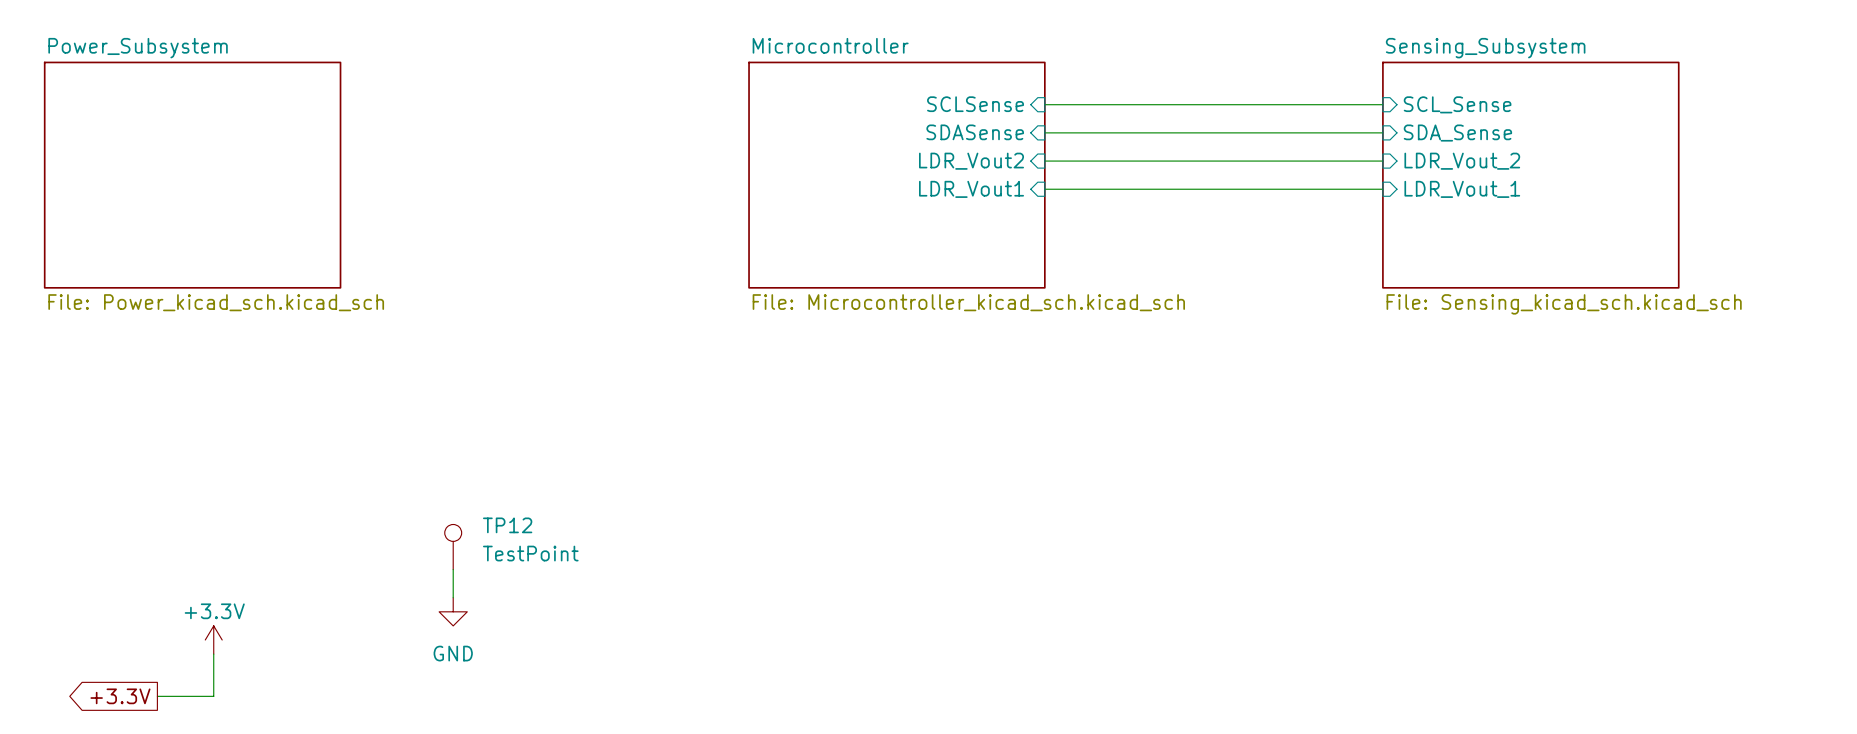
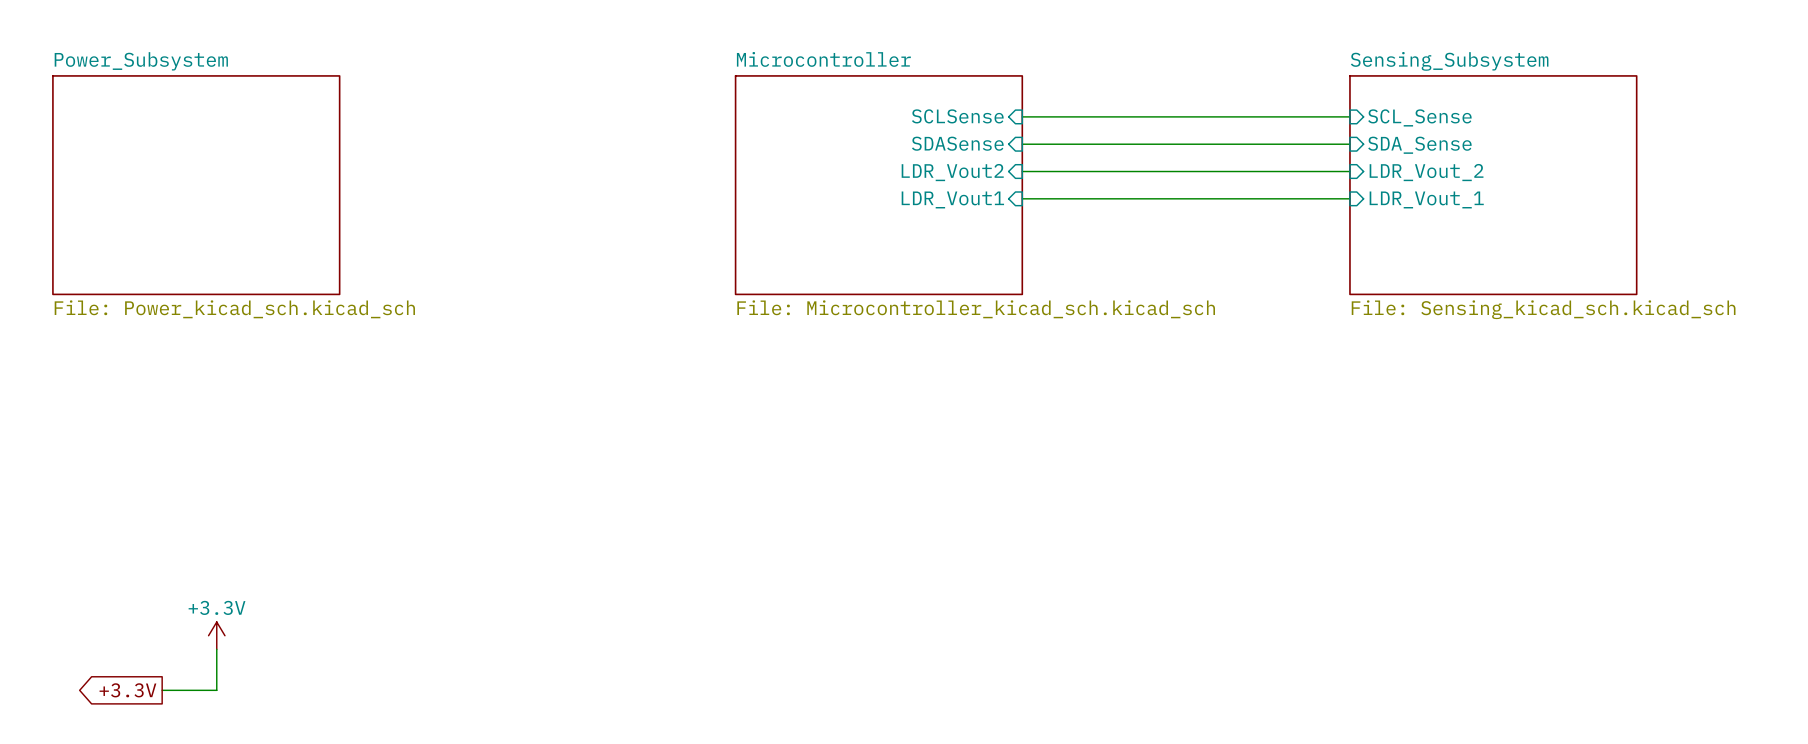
TP12: TestPoint (453, 547) -> none
wire: (453, 569) (453, 597) -> none
power symbol: GND (453, 611) -> none

